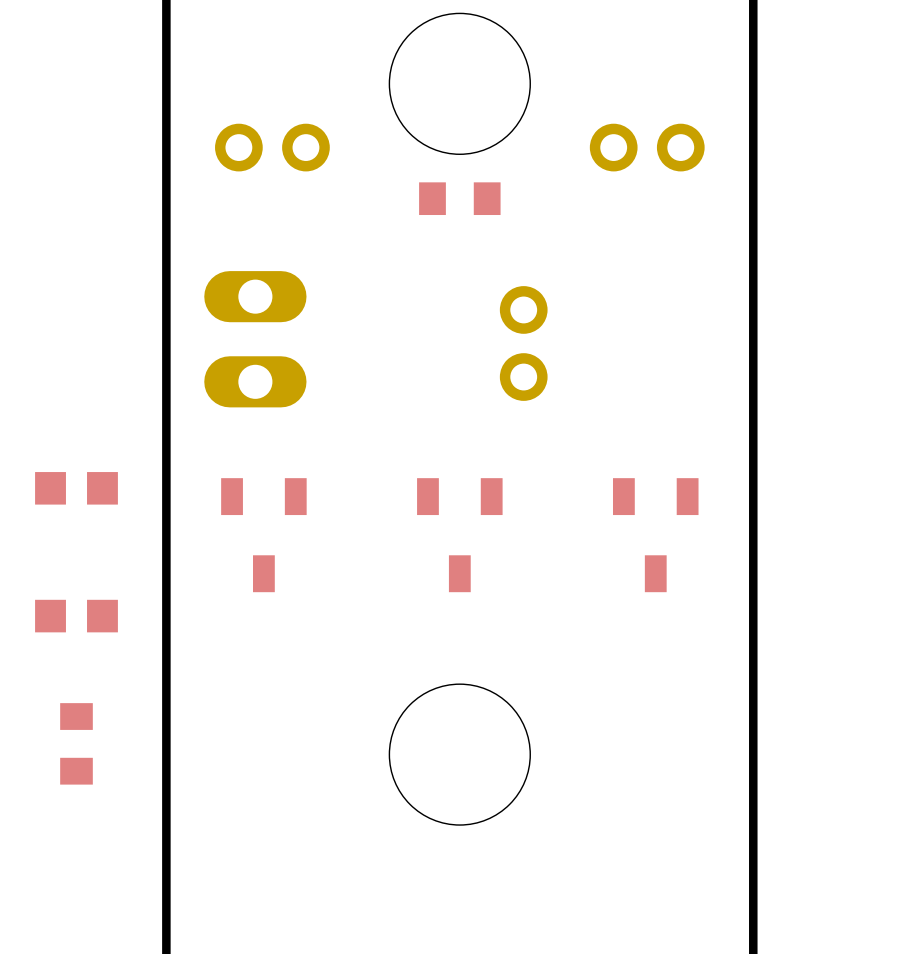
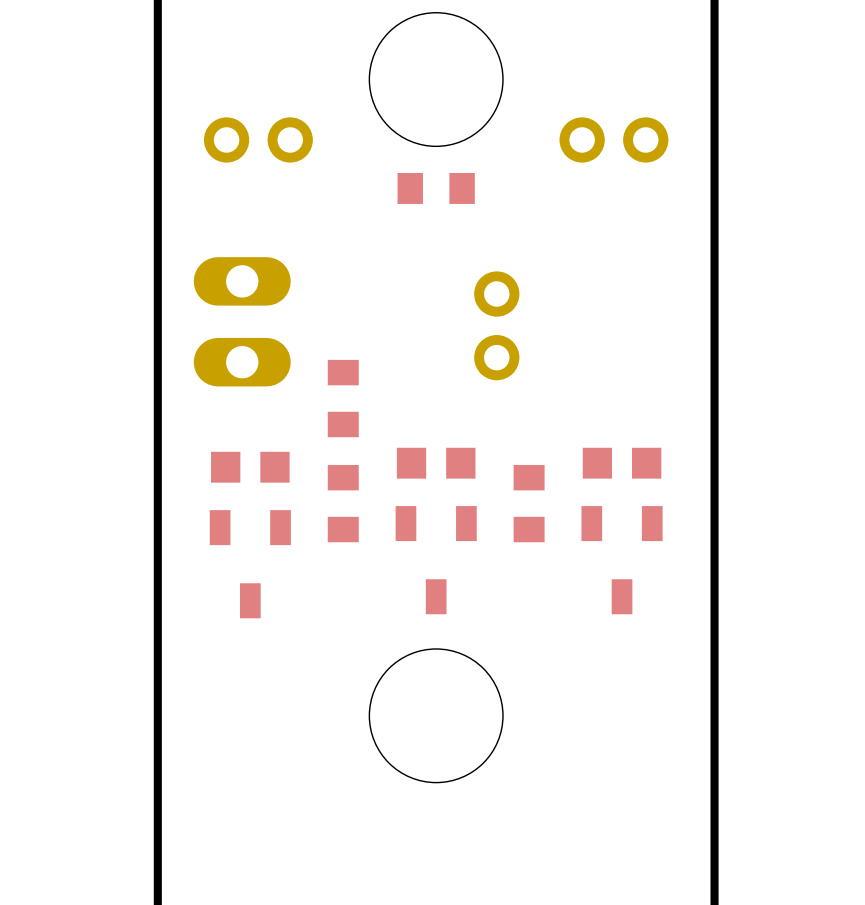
part: none -> (343, 398)
part: (76, 488) -> none
part: none -> (436, 463)
part: none -> (622, 463)
part: none -> (250, 467)
part: none -> (343, 503)
part: none -> (529, 503)
part position: (263, 535) -> (250, 564)
part position: (459, 535) -> (436, 560)
part position: (655, 535) -> (622, 560)
part: (76, 616) -> none
part: (76, 743) -> none

